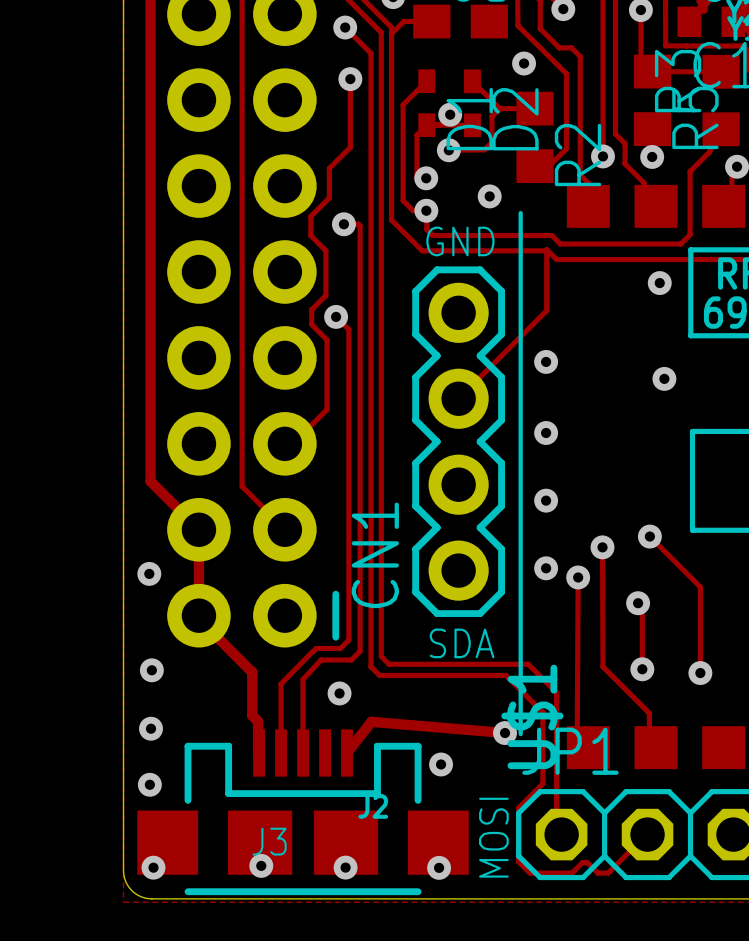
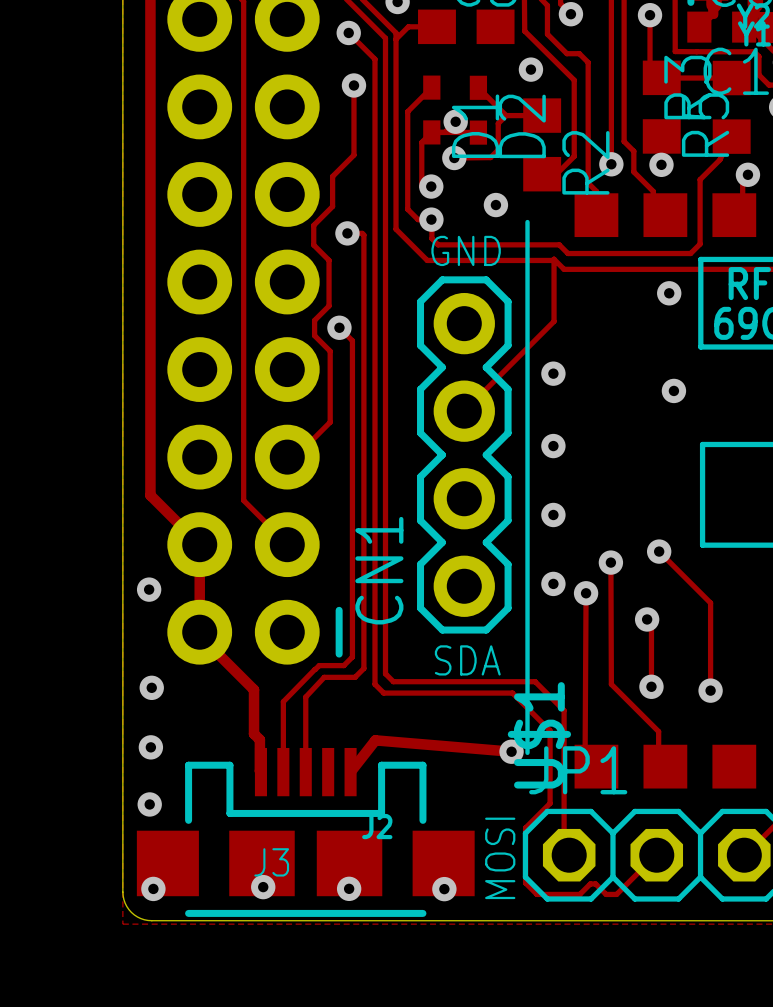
via: (339, 693) -> none
via: (441, 764) -> none

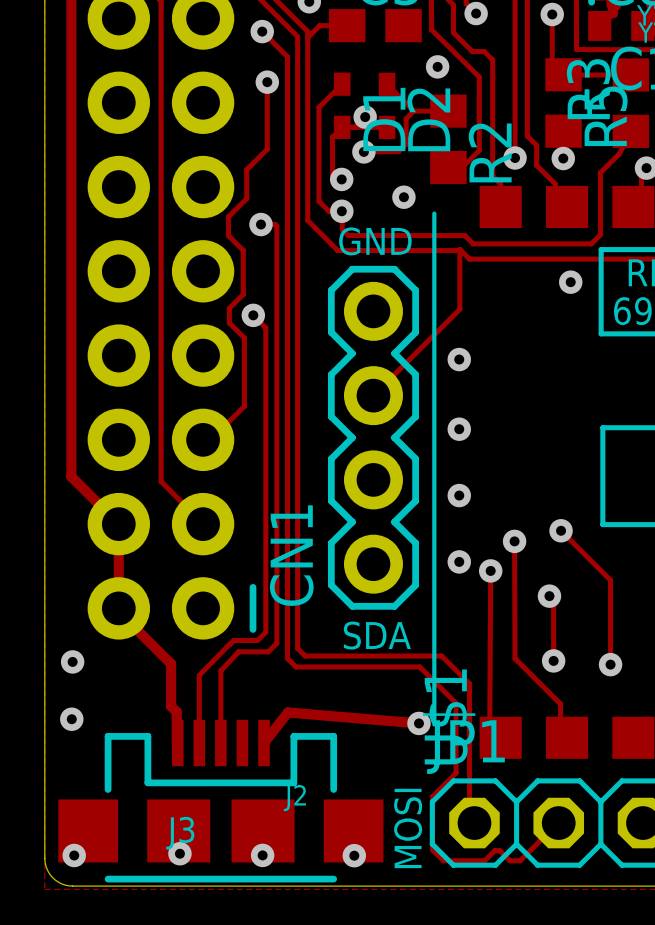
via: (673, 390) -> none
via: (149, 589) -> none
via: (149, 804) -> none

